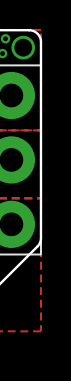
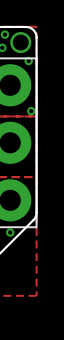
via: none -> (28, 61)
via: none -> (31, 111)
via: none -> (10, 232)

